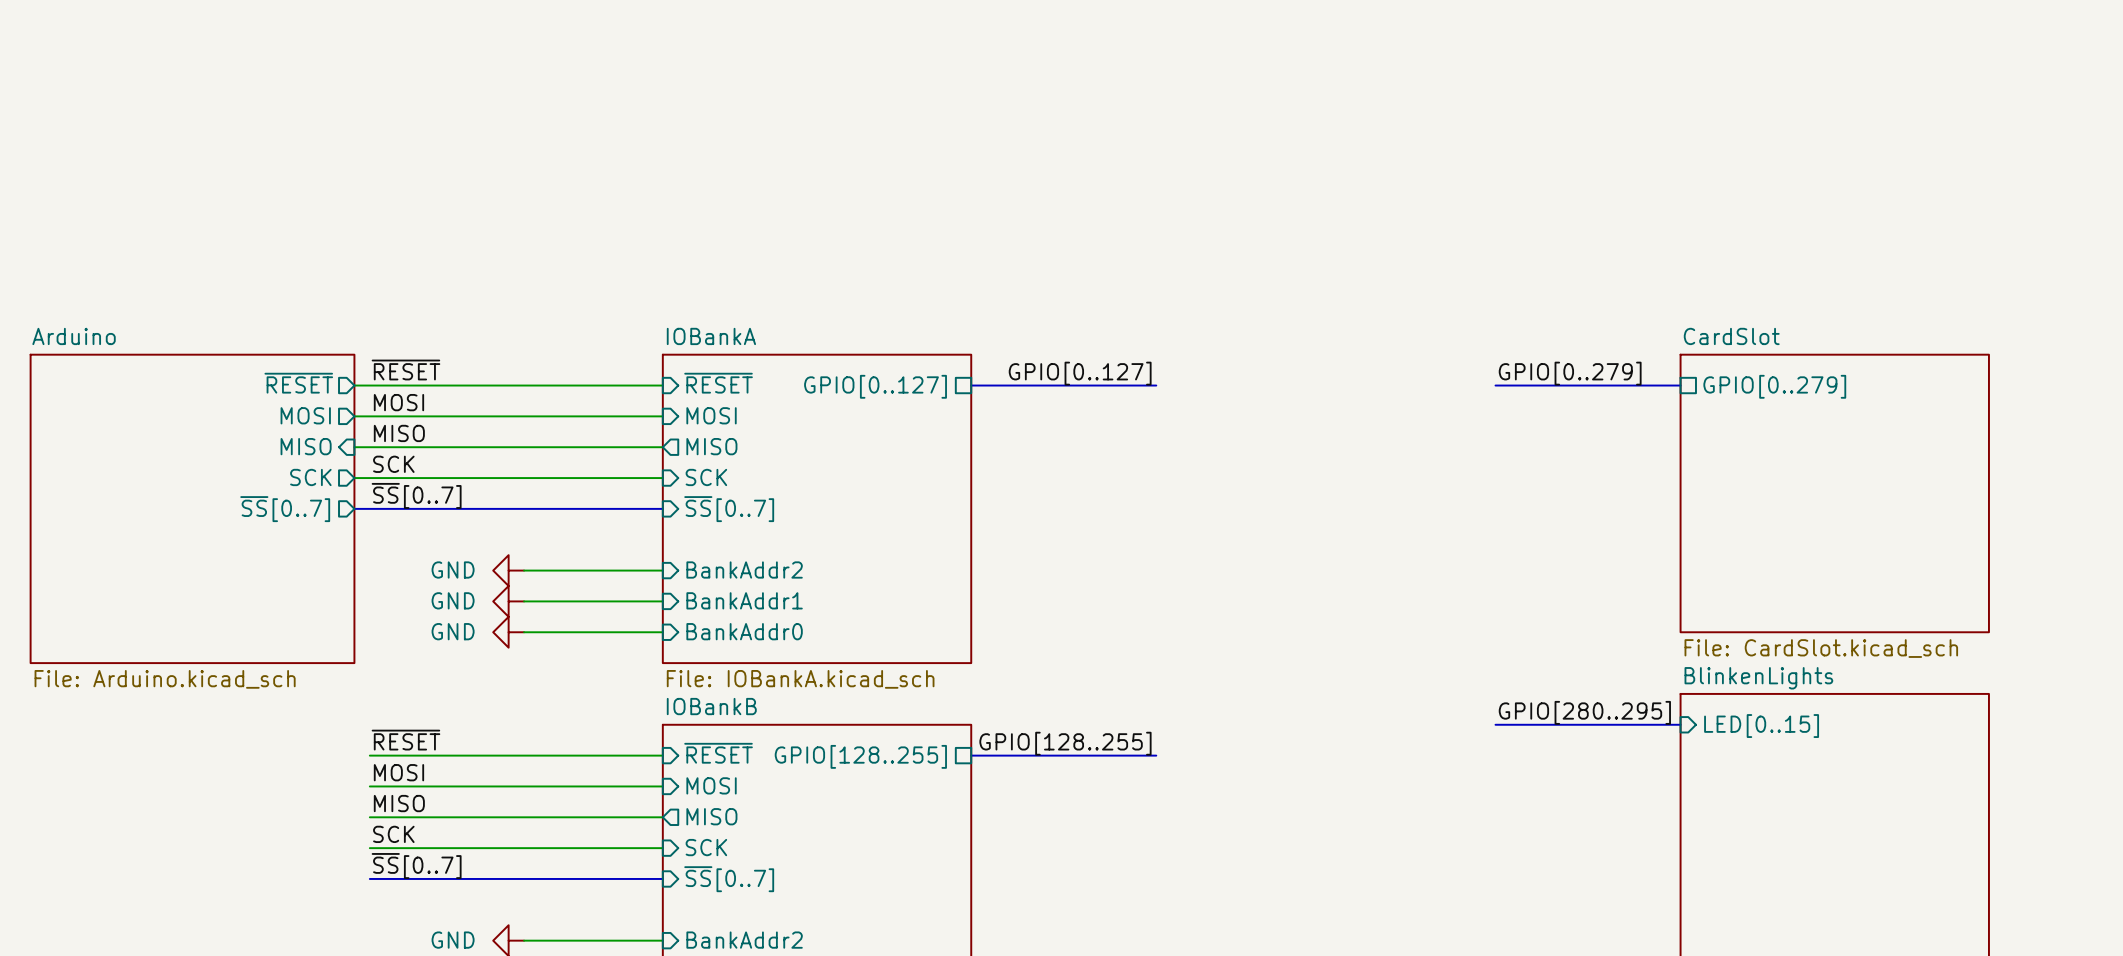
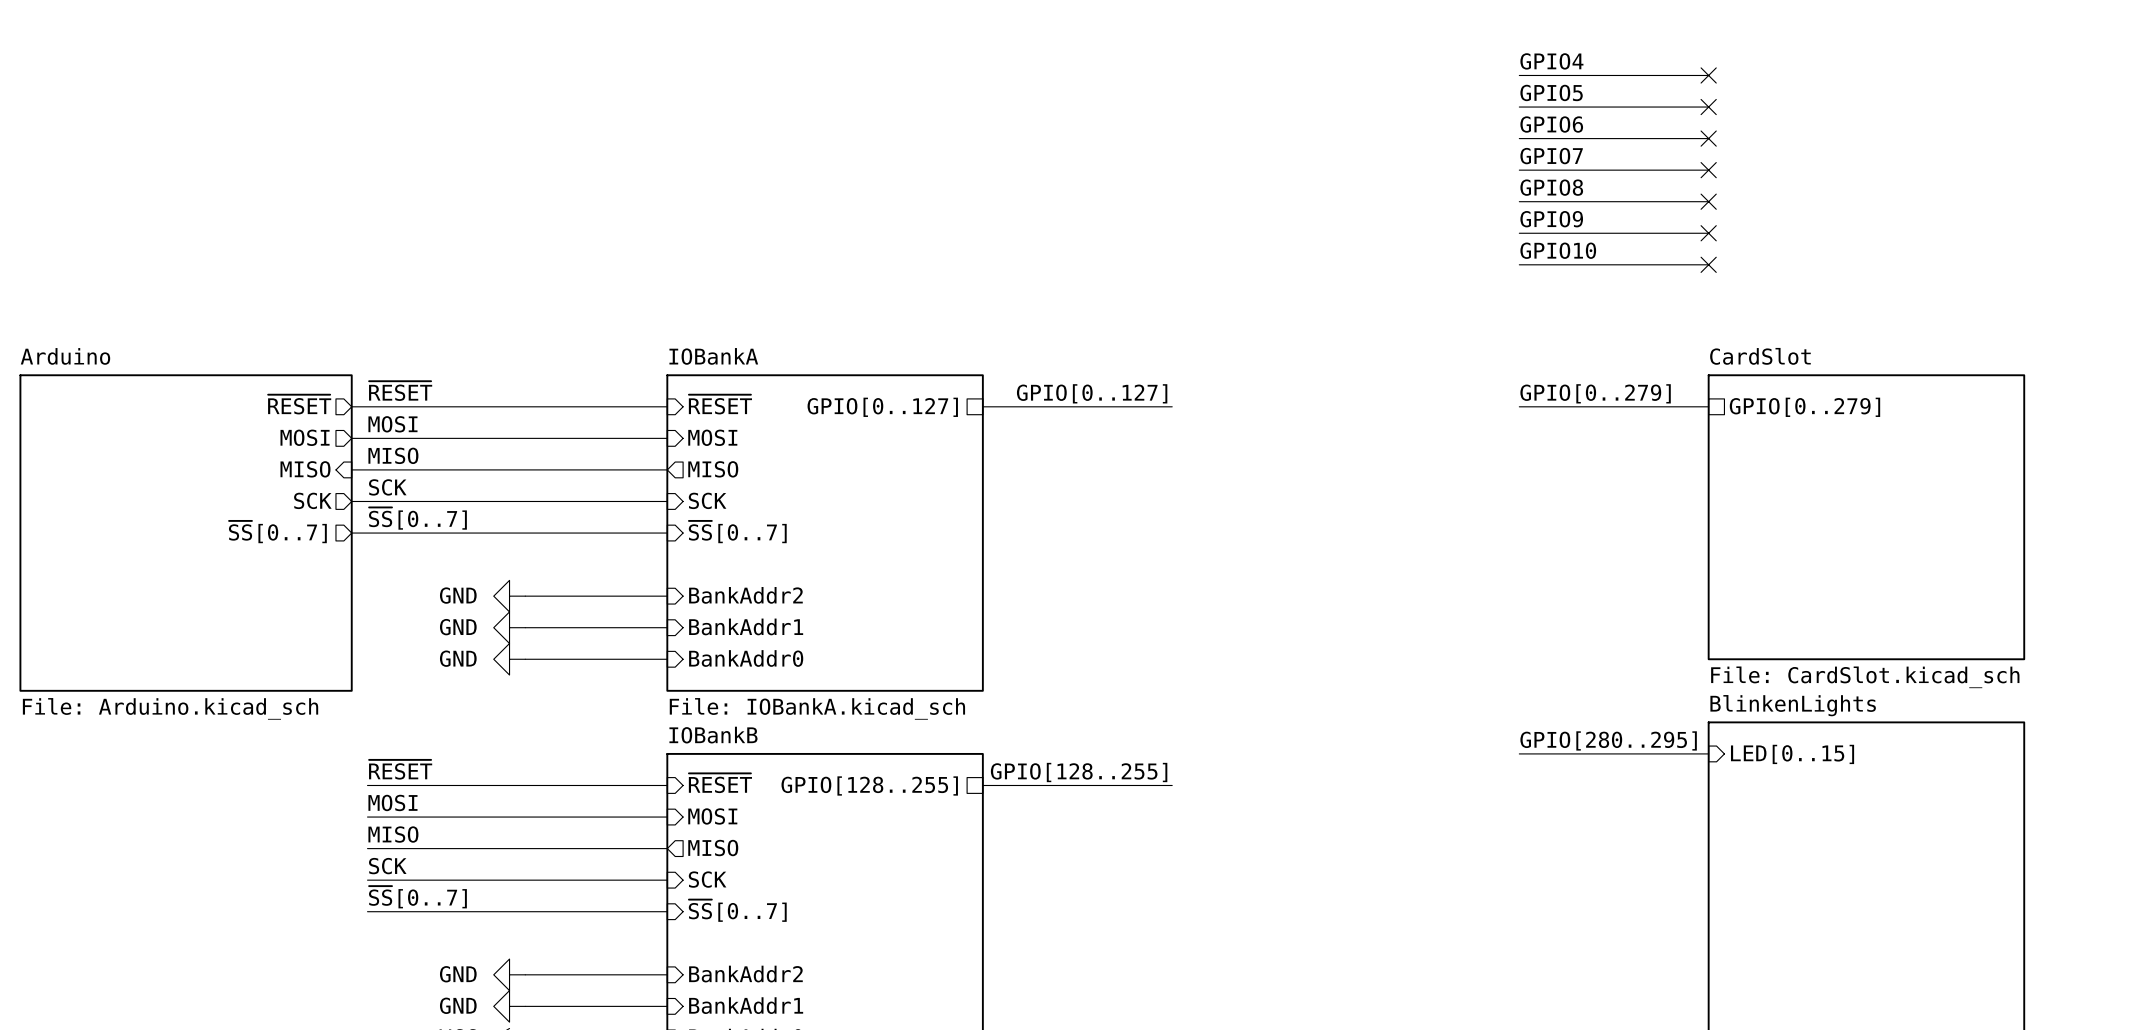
label: none -> GPIO4 (1551, 61)
wire: none -> (1519, 75) (1708, 75)
no-connect mark: none -> (1708, 75)
label: none -> GPIO5 (1551, 92)
wire: none -> (1519, 107) (1708, 107)
no-connect mark: none -> (1708, 107)
label: none -> GPIO6 (1551, 124)
wire: none -> (1519, 138) (1708, 138)
no-connect mark: none -> (1708, 138)
label: none -> GPIO7 (1551, 156)
wire: none -> (1519, 170) (1708, 170)
no-connect mark: none -> (1708, 170)
label: none -> GPIO8 (1551, 187)
wire: none -> (1519, 201) (1708, 201)
no-connect mark: none -> (1708, 201)
label: none -> GPIO9 (1551, 219)
wire: none -> (1519, 233) (1708, 233)
no-connect mark: none -> (1708, 233)
label: none -> GPIO10 (1558, 250)
wire: none -> (1519, 264) (1708, 264)
no-connect mark: none -> (1708, 264)

